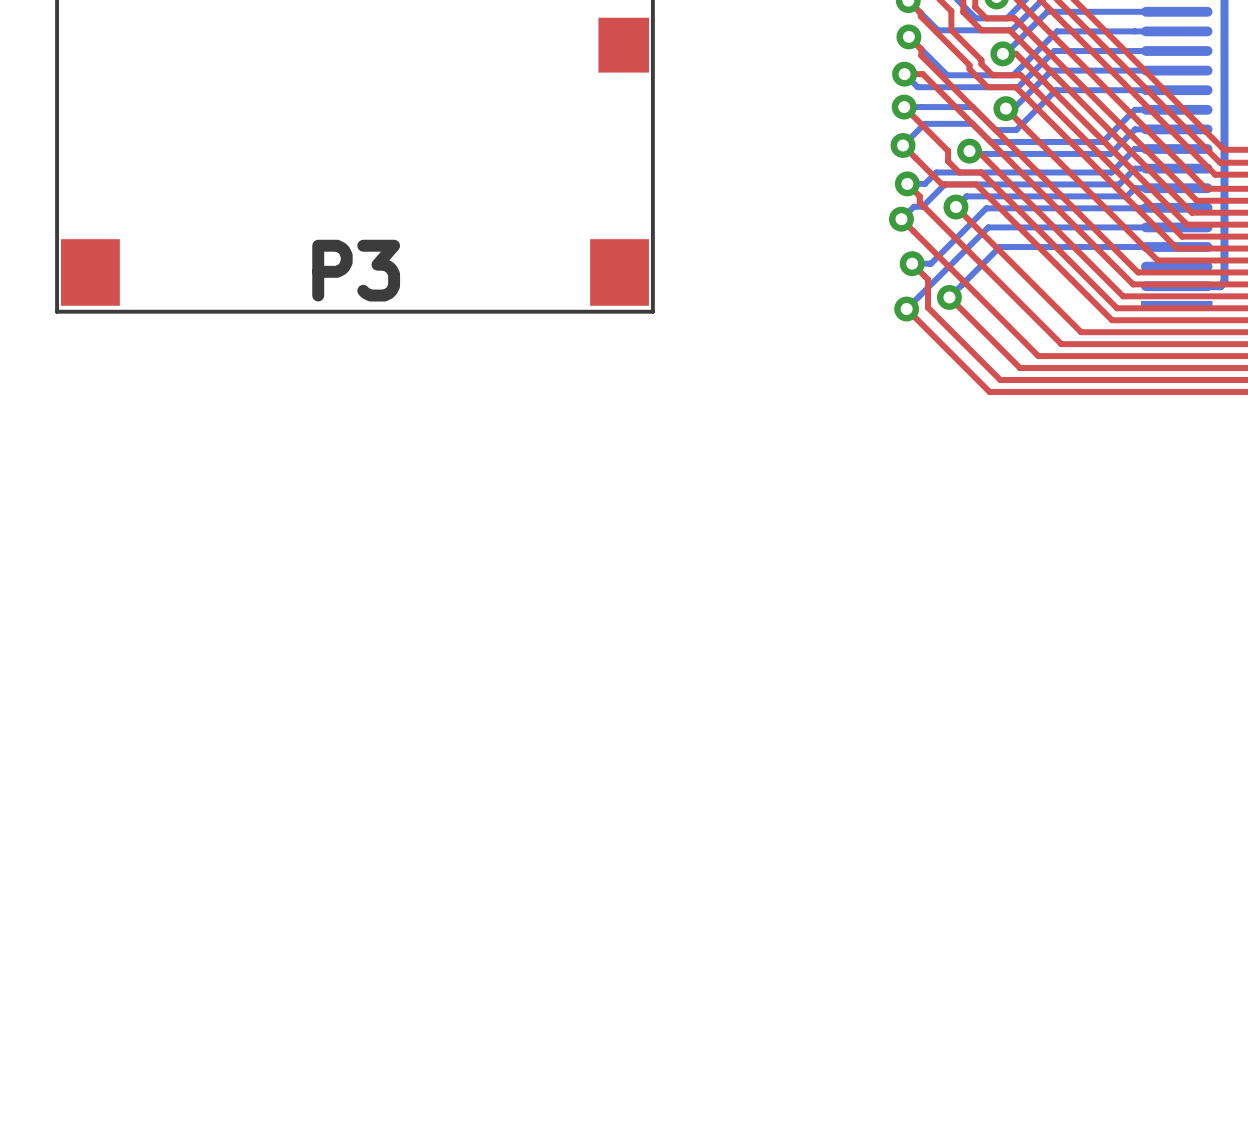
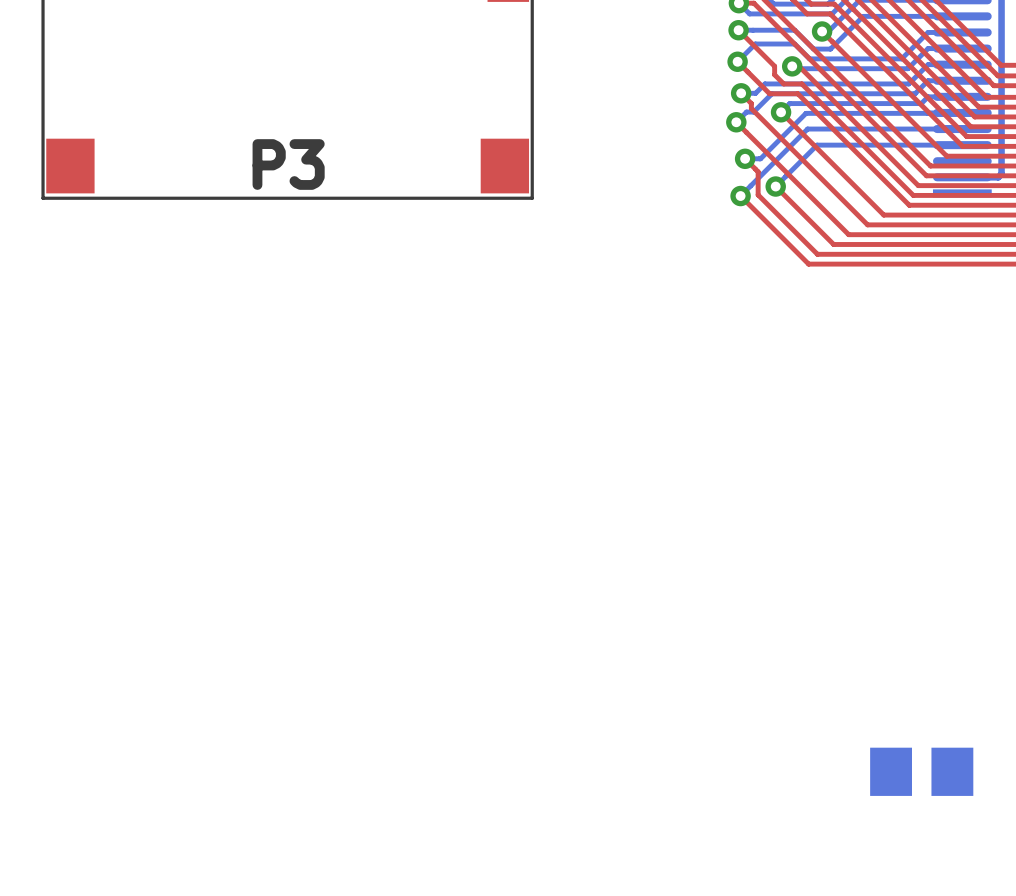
part: none -> (921, 771)

